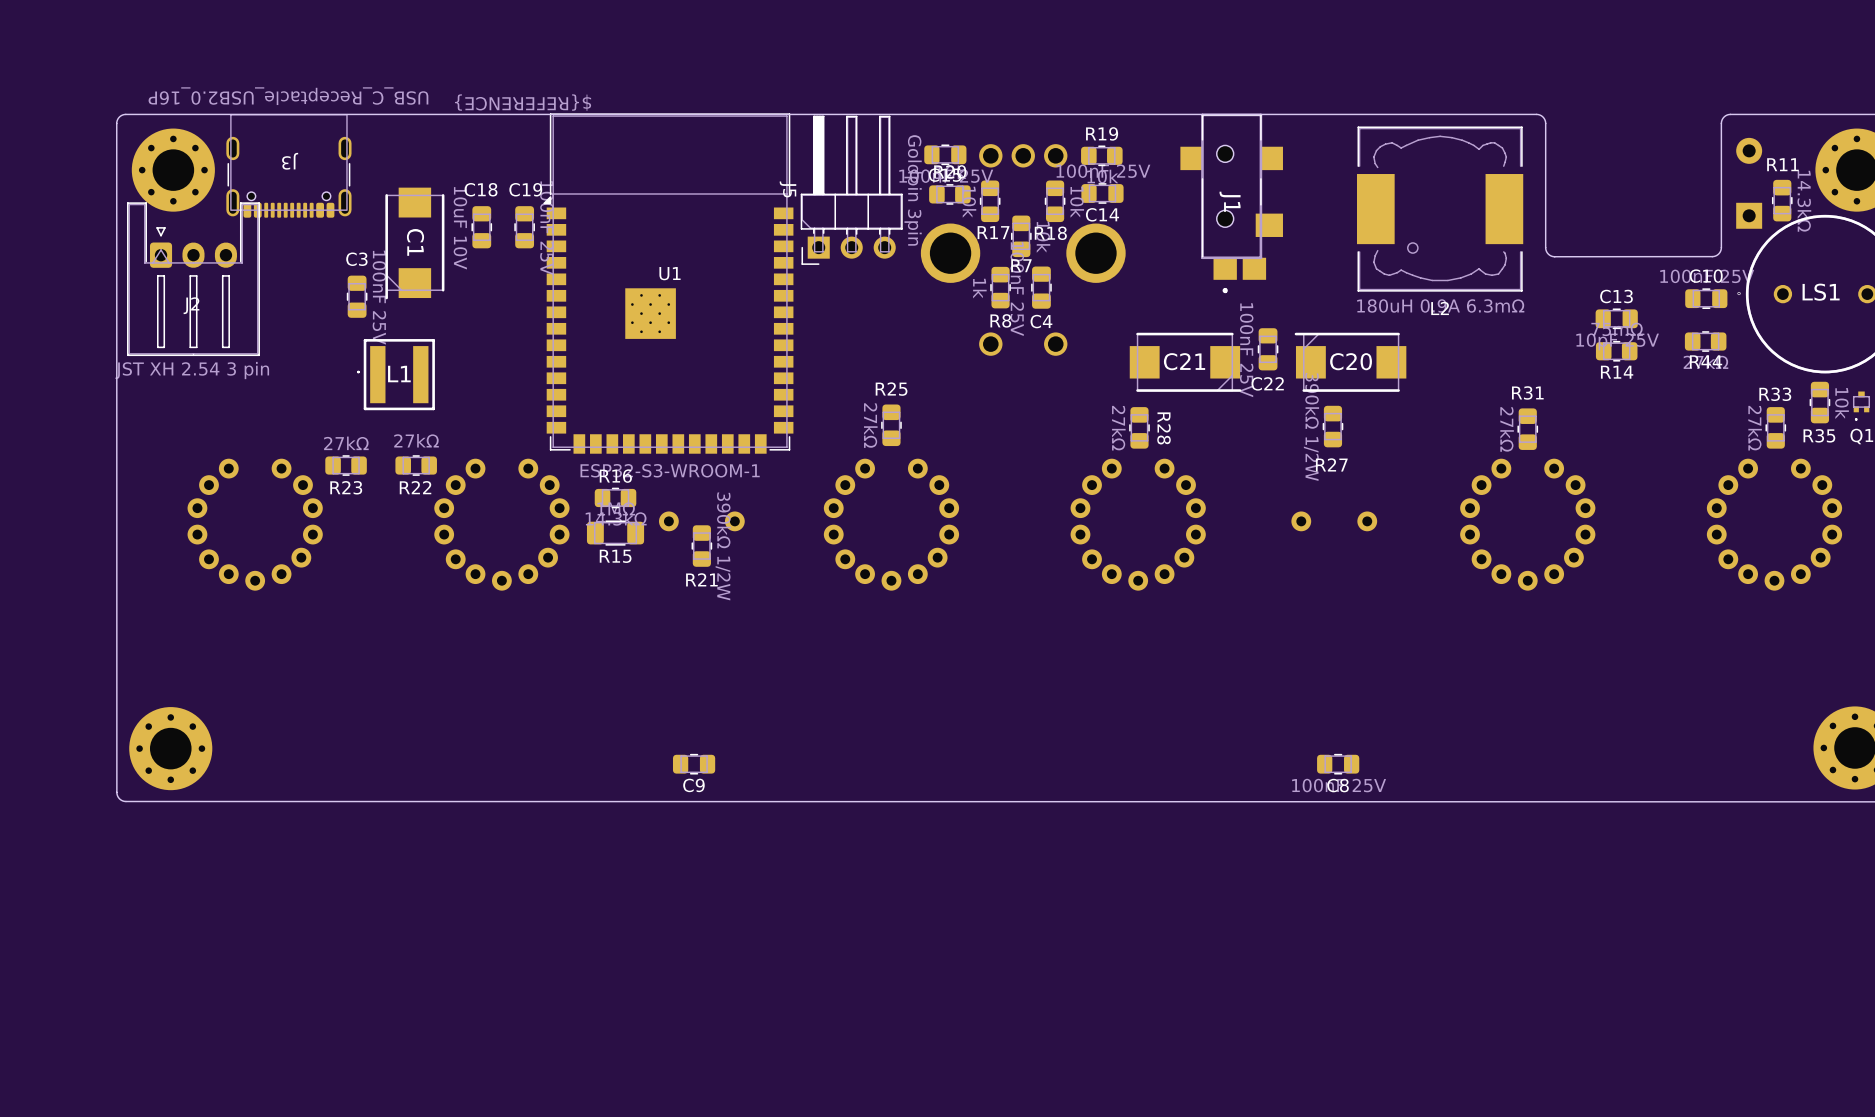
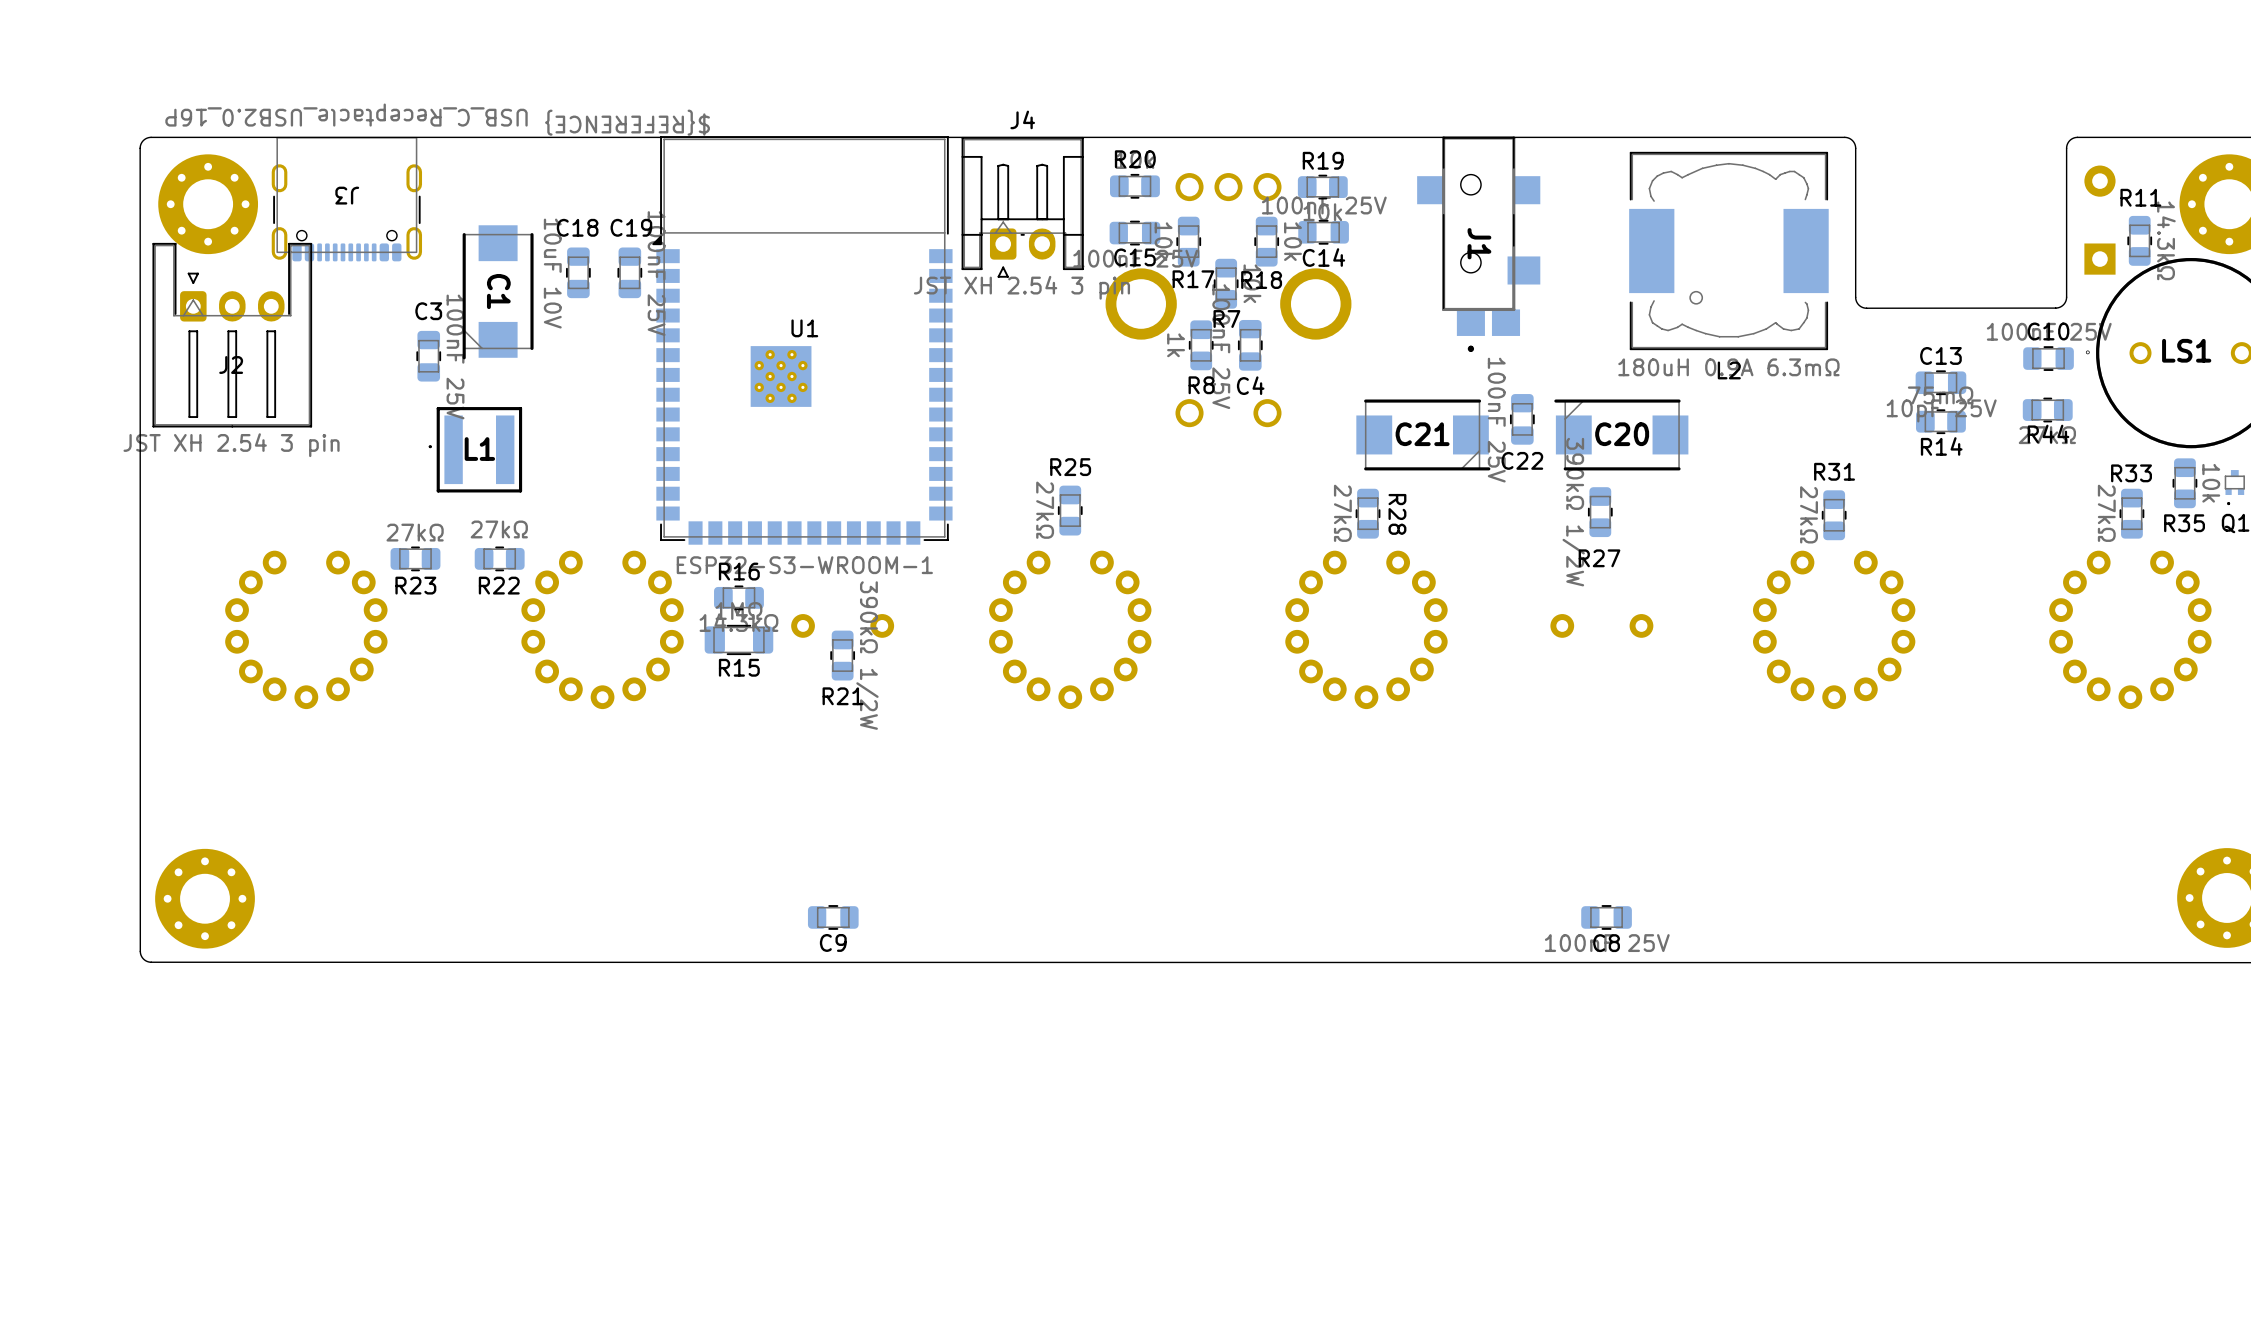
C15 position: (945, 154) -> (1134, 233)
J4: none -> JST XH 2.54 3 pin (1022, 207)
J5: Goldpin 3pin (851, 190) -> none
R20 position: (949, 194) -> (1134, 186)

